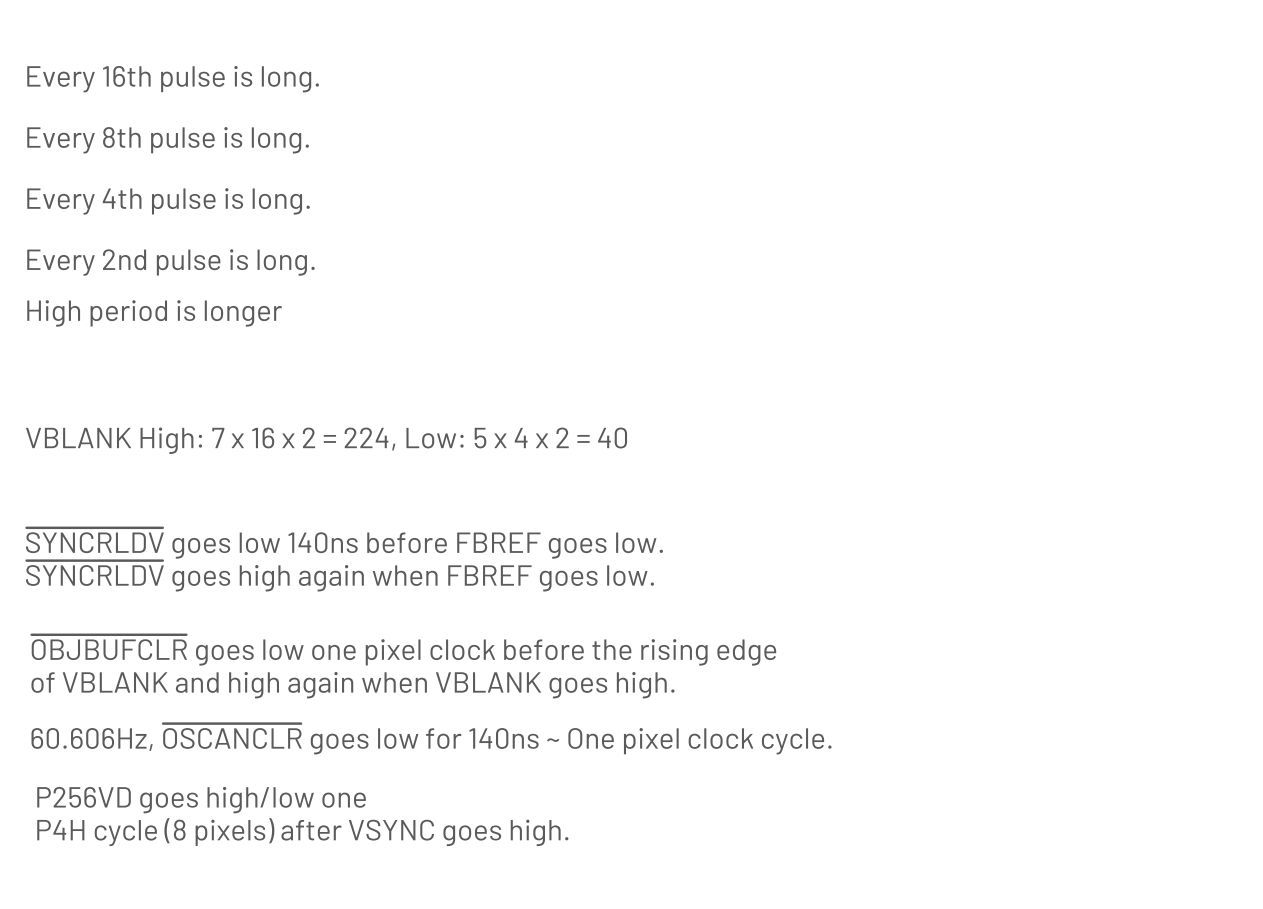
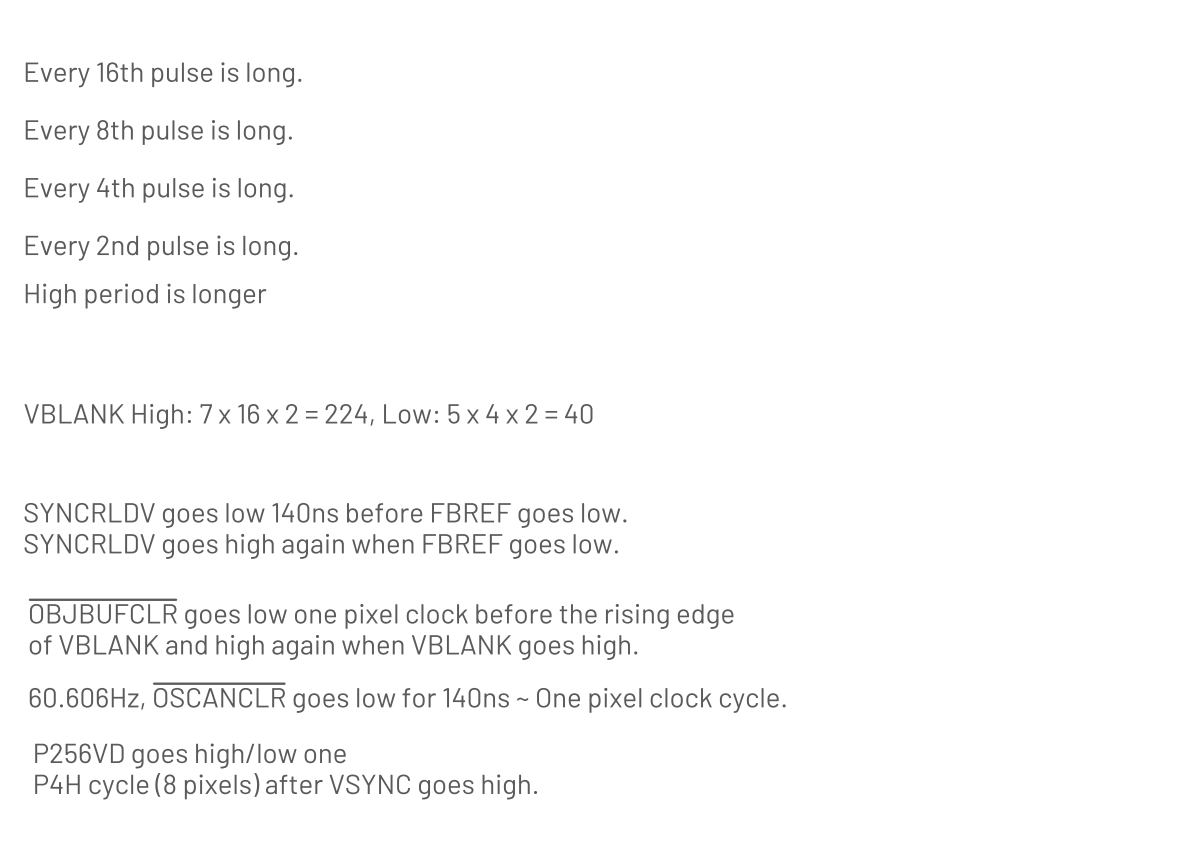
text: ~{SYNCRLDV} goes low 140ns before FBREF goes low. (344, 543) -> SYNCRLDV goes low 140ns before FBREF goes low. (325, 515)
text: ~{SYNCRLDV} goes high again when FBREF goes low. (340, 576) -> SYNCRLDV goes high again when FBREF goes low. (321, 546)

